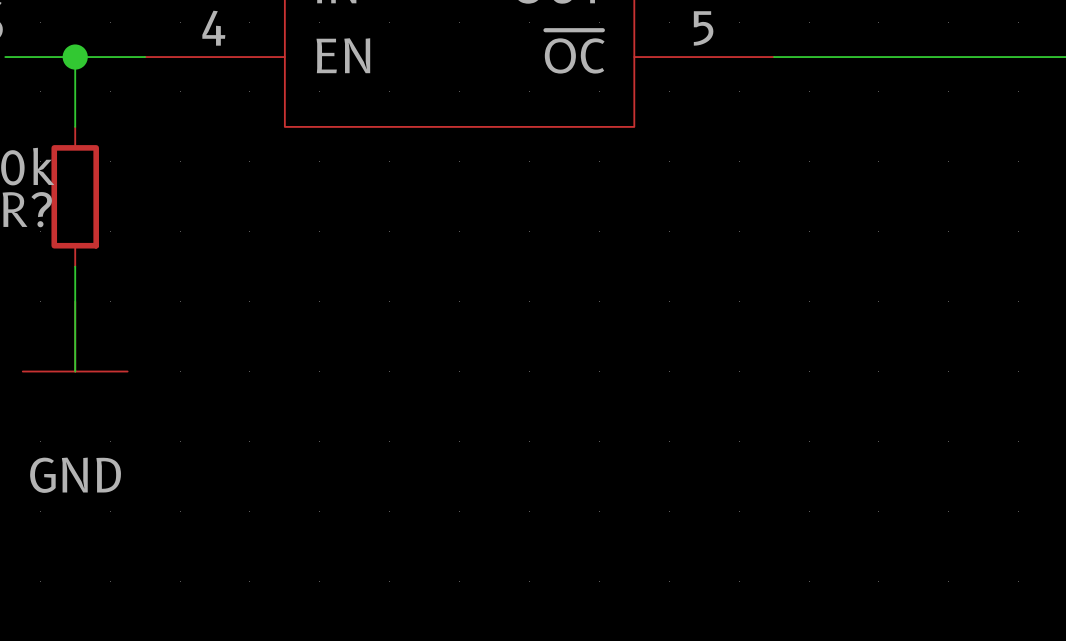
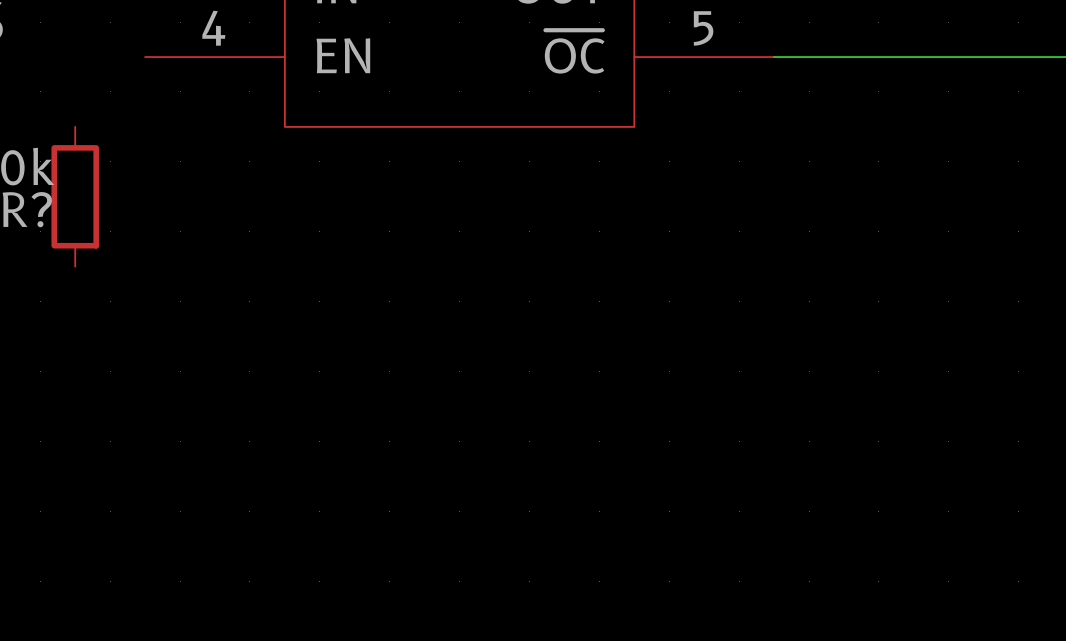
wire: (5, 57) (145, 57) -> none
wire: (75, 57) (75, 126) -> none
junction: (75, 57) -> none
wire: (75, 266) (75, 371) -> none
power symbol: GND (75, 336) -> none

